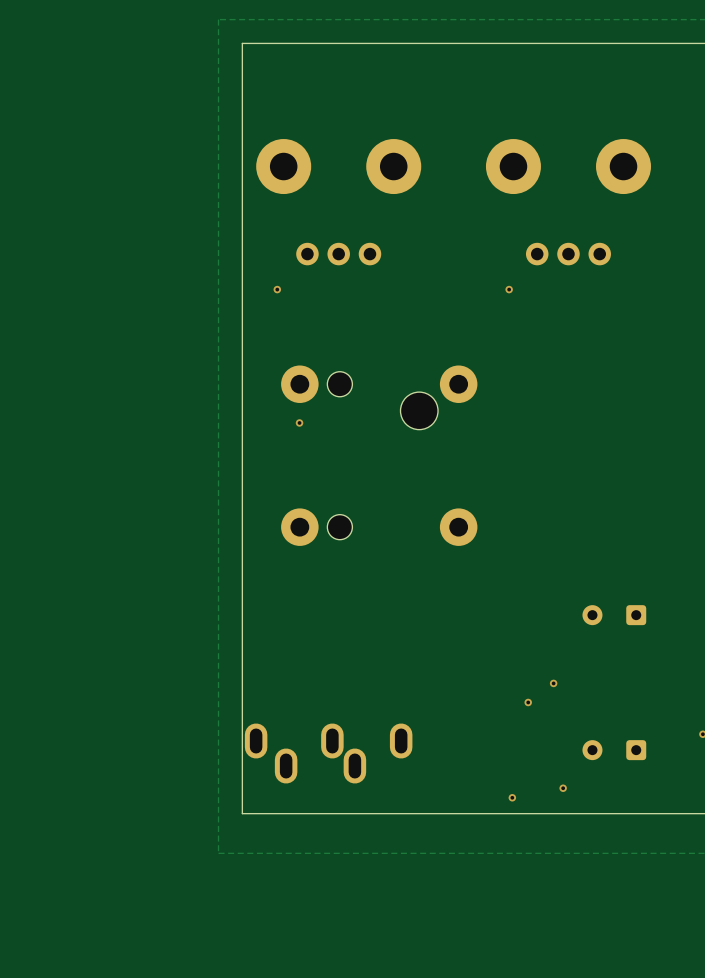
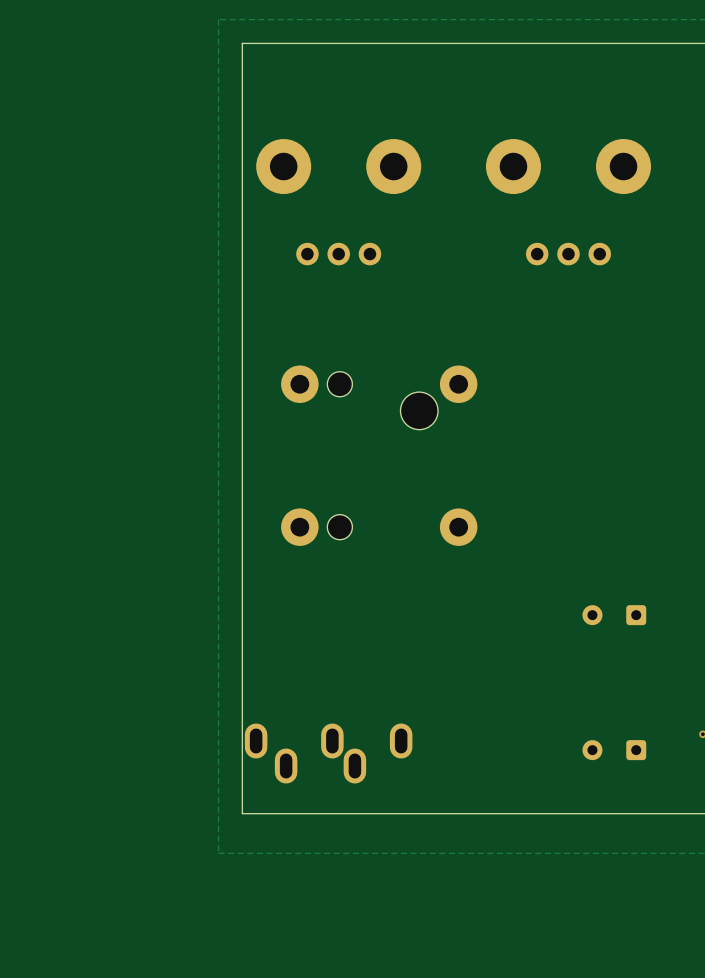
via: (277, 289) -> none
via: (509, 289) -> none
via: (299, 422) -> none
via: (553, 683) -> none
via: (528, 702) -> none
via: (563, 788) -> none
via: (512, 797) -> none

